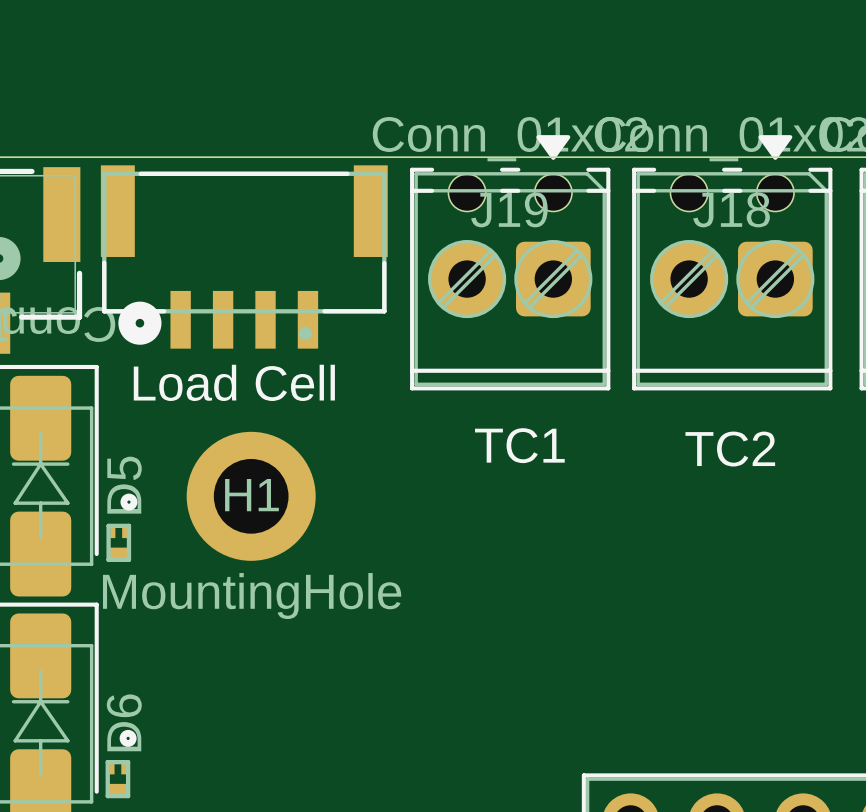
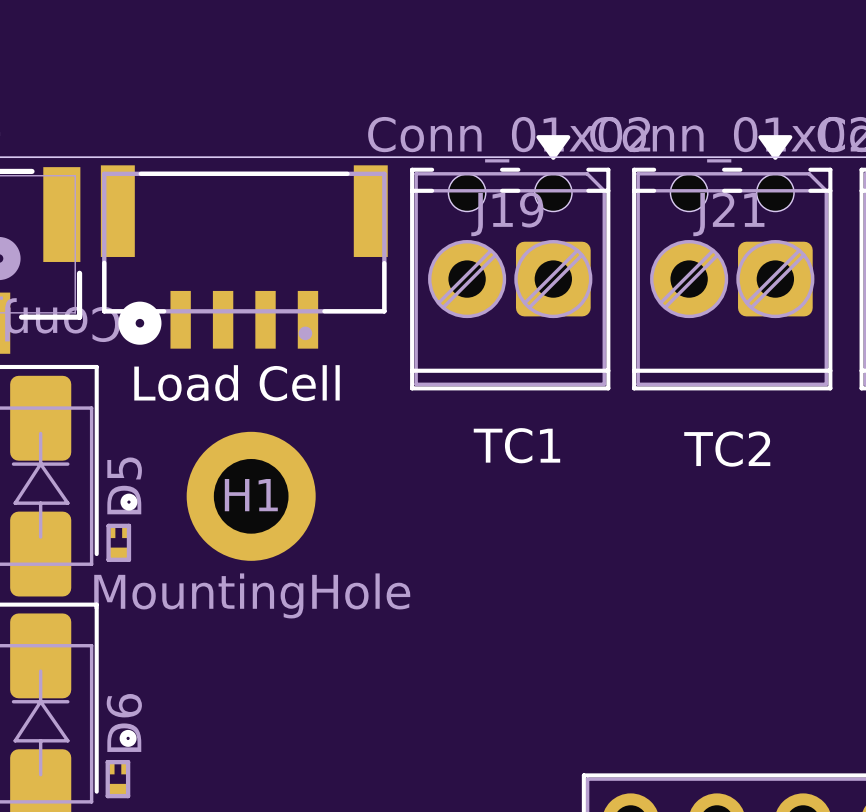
J18 name: J18 (731, 209) -> J21 (728, 214)

